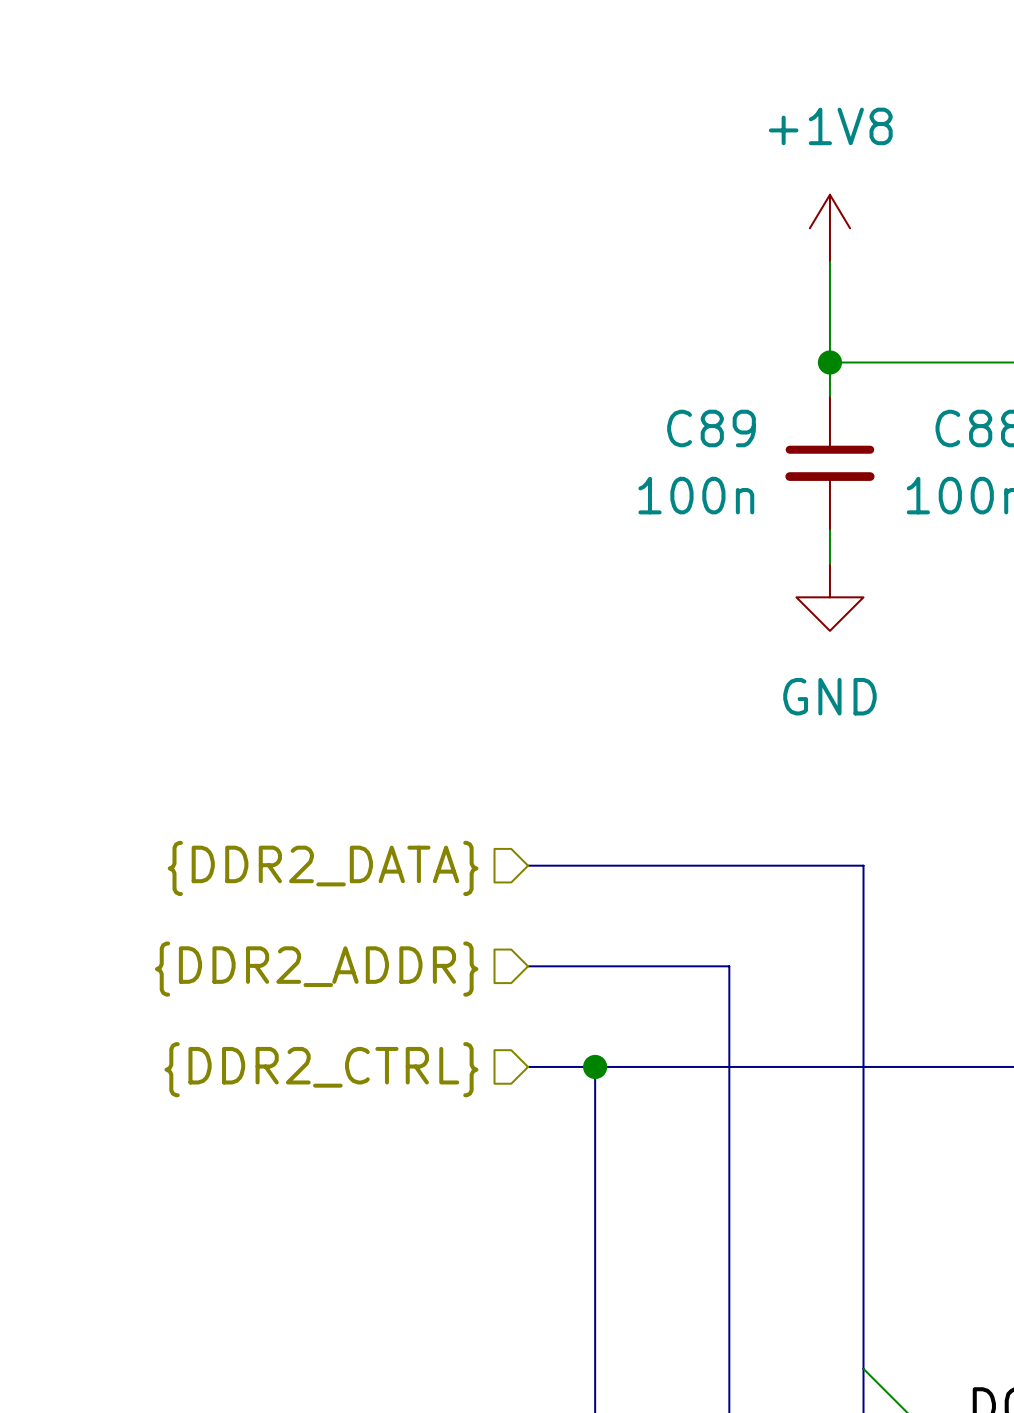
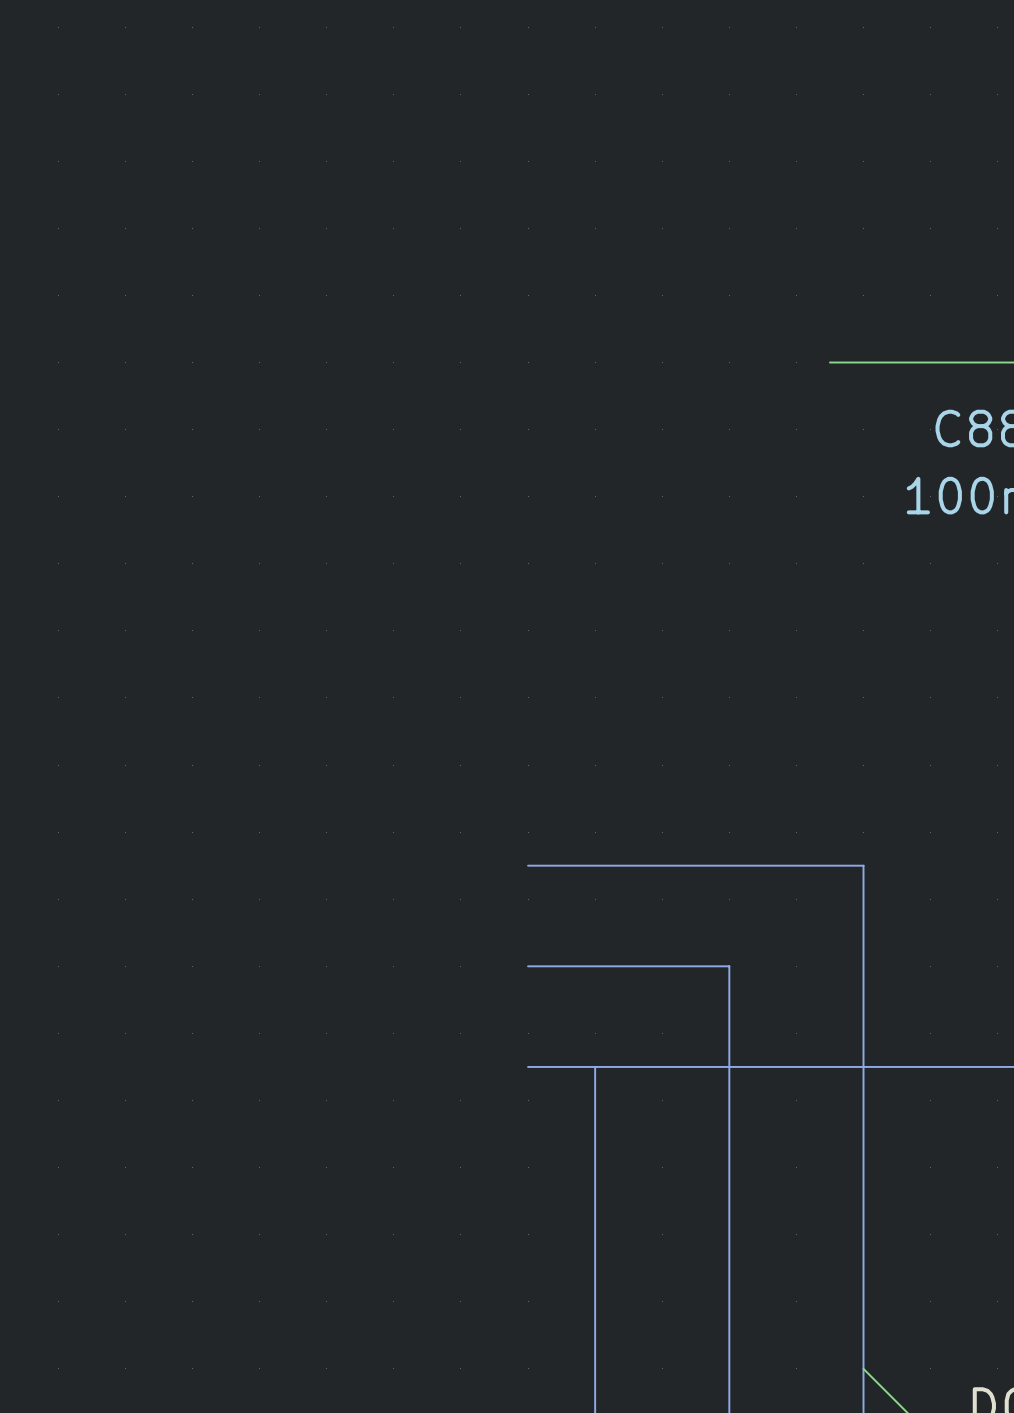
power symbol: +1V8 (829, 228) -> none
wire: (829, 261) (829, 396) -> none
junction: (829, 362) -> none
C89: 100n (829, 463) -> none
wire: (829, 530) (829, 563) -> none
power symbol: GND (829, 597) -> none
hierarchical label: {DDR2_DATA} (323, 868) -> none
hierarchical label: {DDR2_ADDR} (316, 969) -> none
junction: (595, 1066) -> none
hierarchical label: {DDR2_CTRL} (321, 1069) -> none

